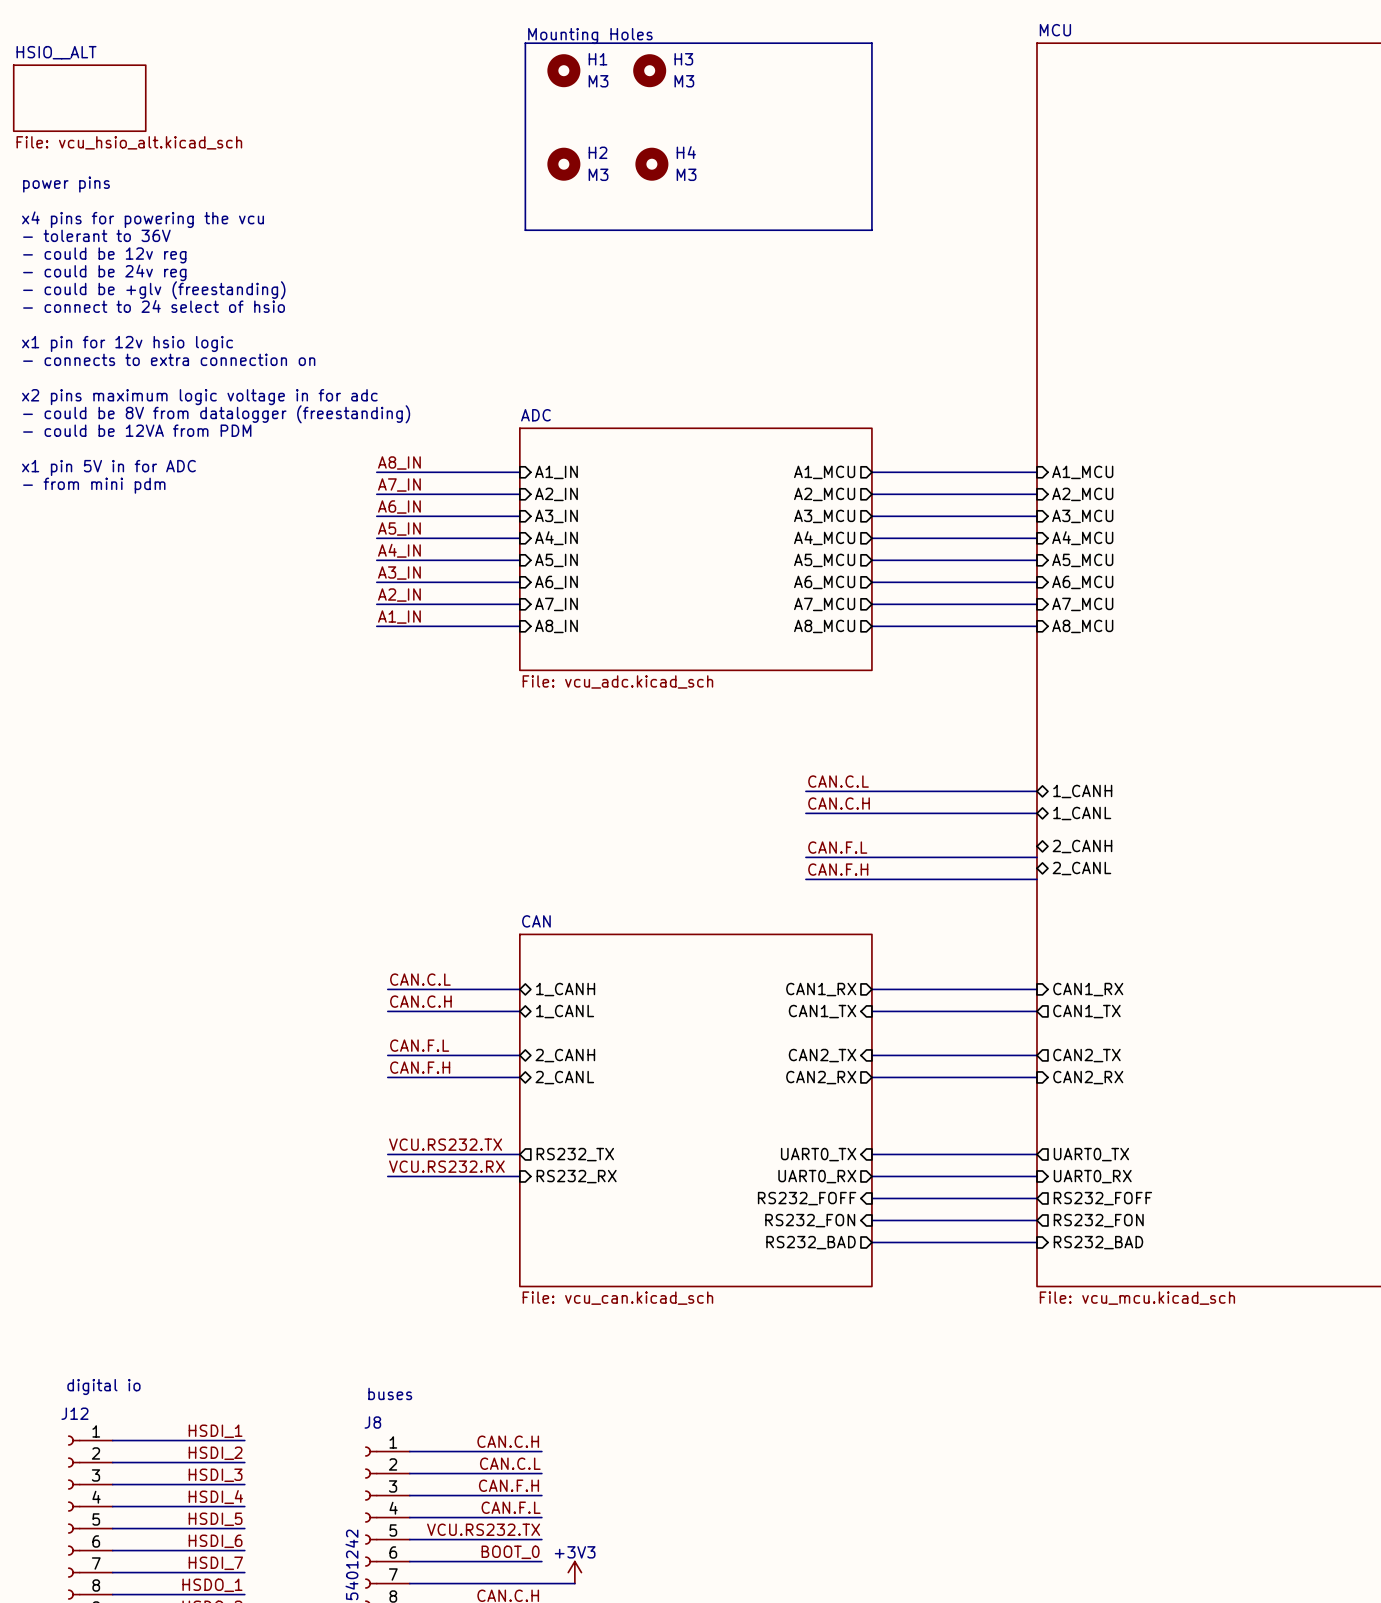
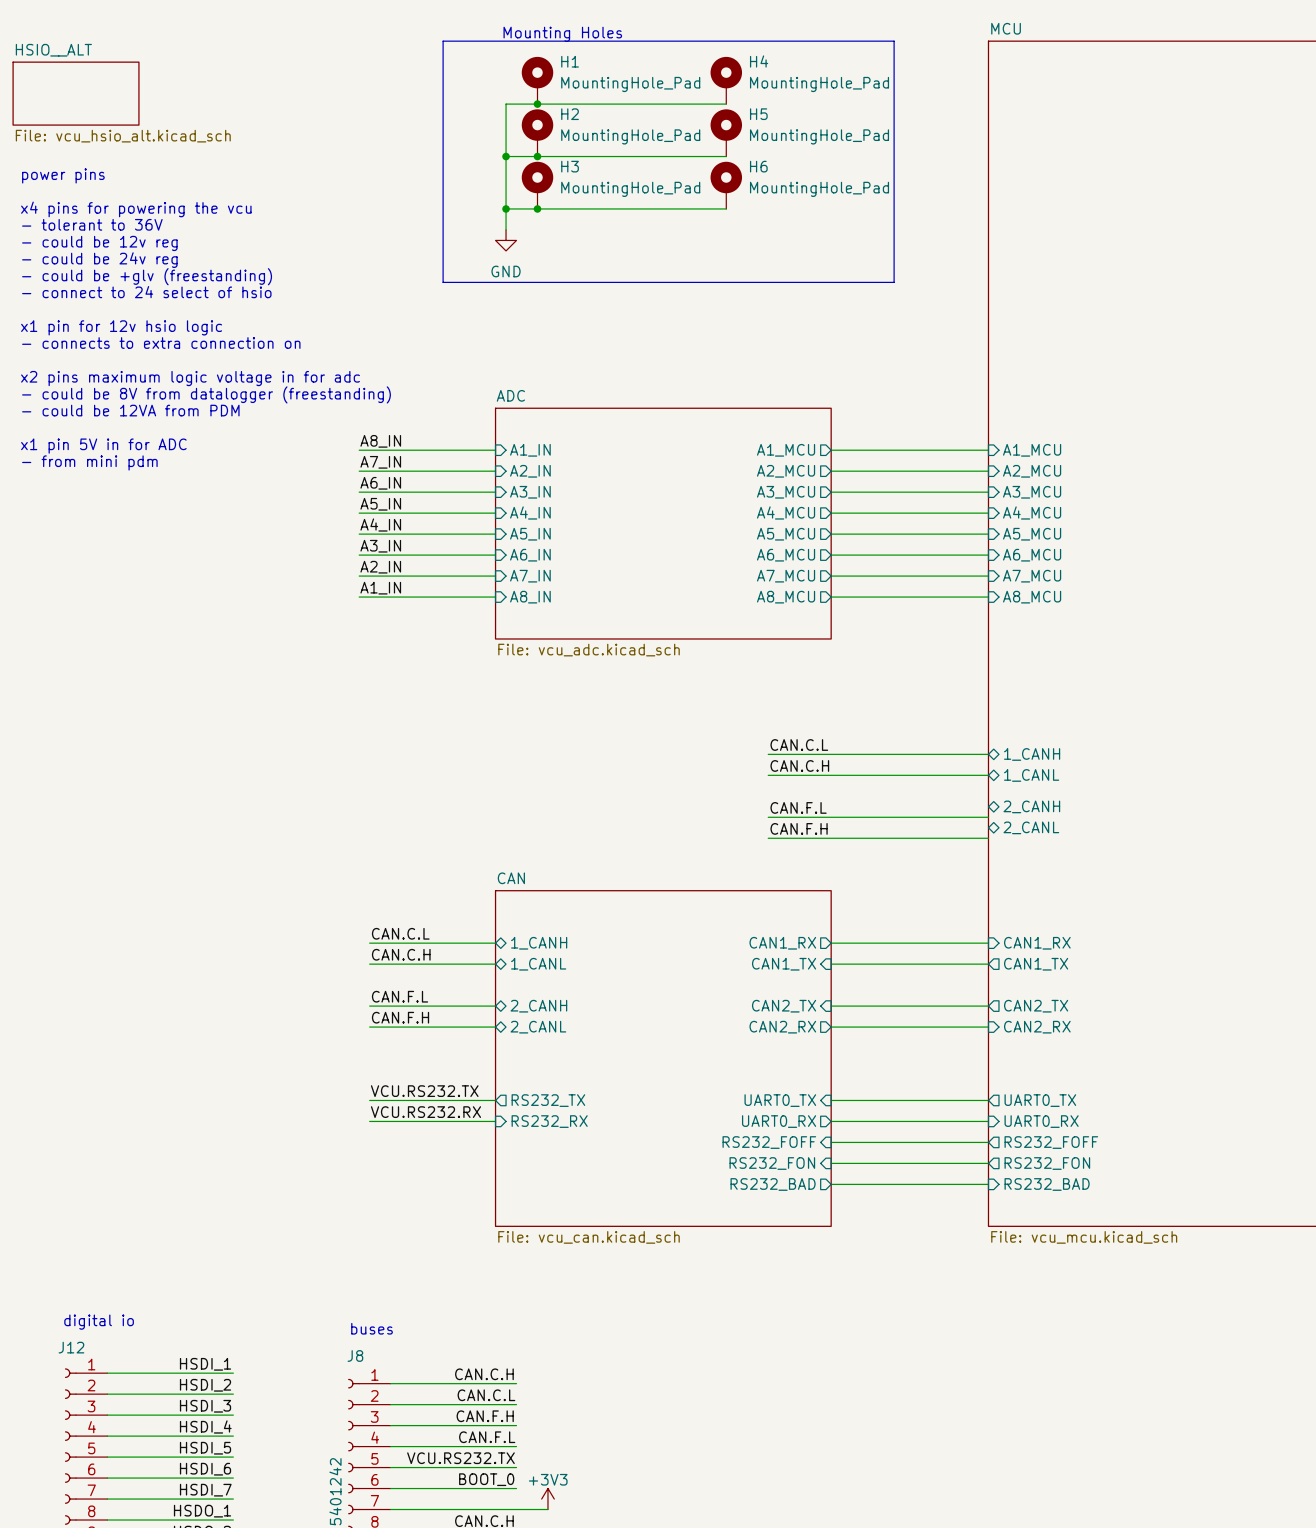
line: (525, 43) (525, 230) (871, 230) (871, 43) -> (500, 41) (443, 41) (443, 282) (894, 282) (894, 41) (831, 41)
H1 symbol: [547, 54, 581, 88] -> [521, 56, 554, 105]
H3 symbol: [633, 54, 667, 88] -> [521, 161, 554, 209]
H1 value: M3 (598, 81) -> MountingHole_Pad (630, 84)
H3 value: M3 (684, 81) -> MountingHole_Pad (630, 189)
junction: none -> (537, 104)
wire: none -> (726, 104) (506, 104) (506, 229)
H5: none -> MountingHole_Pad (726, 132)
H2 symbol: [547, 147, 581, 181] -> [521, 109, 554, 157]
H4 symbol: [635, 147, 669, 181] -> [710, 56, 743, 105]
wire: none -> (506, 156) (726, 156)
junction: none -> (506, 156)
junction: none -> (537, 156)
H2 value: M3 (598, 174) -> MountingHole_Pad (630, 136)
H4 value: M3 (686, 174) -> MountingHole_Pad (819, 84)
H6: none -> MountingHole_Pad (726, 185)
wire: none -> (506, 208) (726, 208)
junction: none -> (506, 208)
junction: none -> (537, 208)
power symbol: none -> GND (506, 240)

